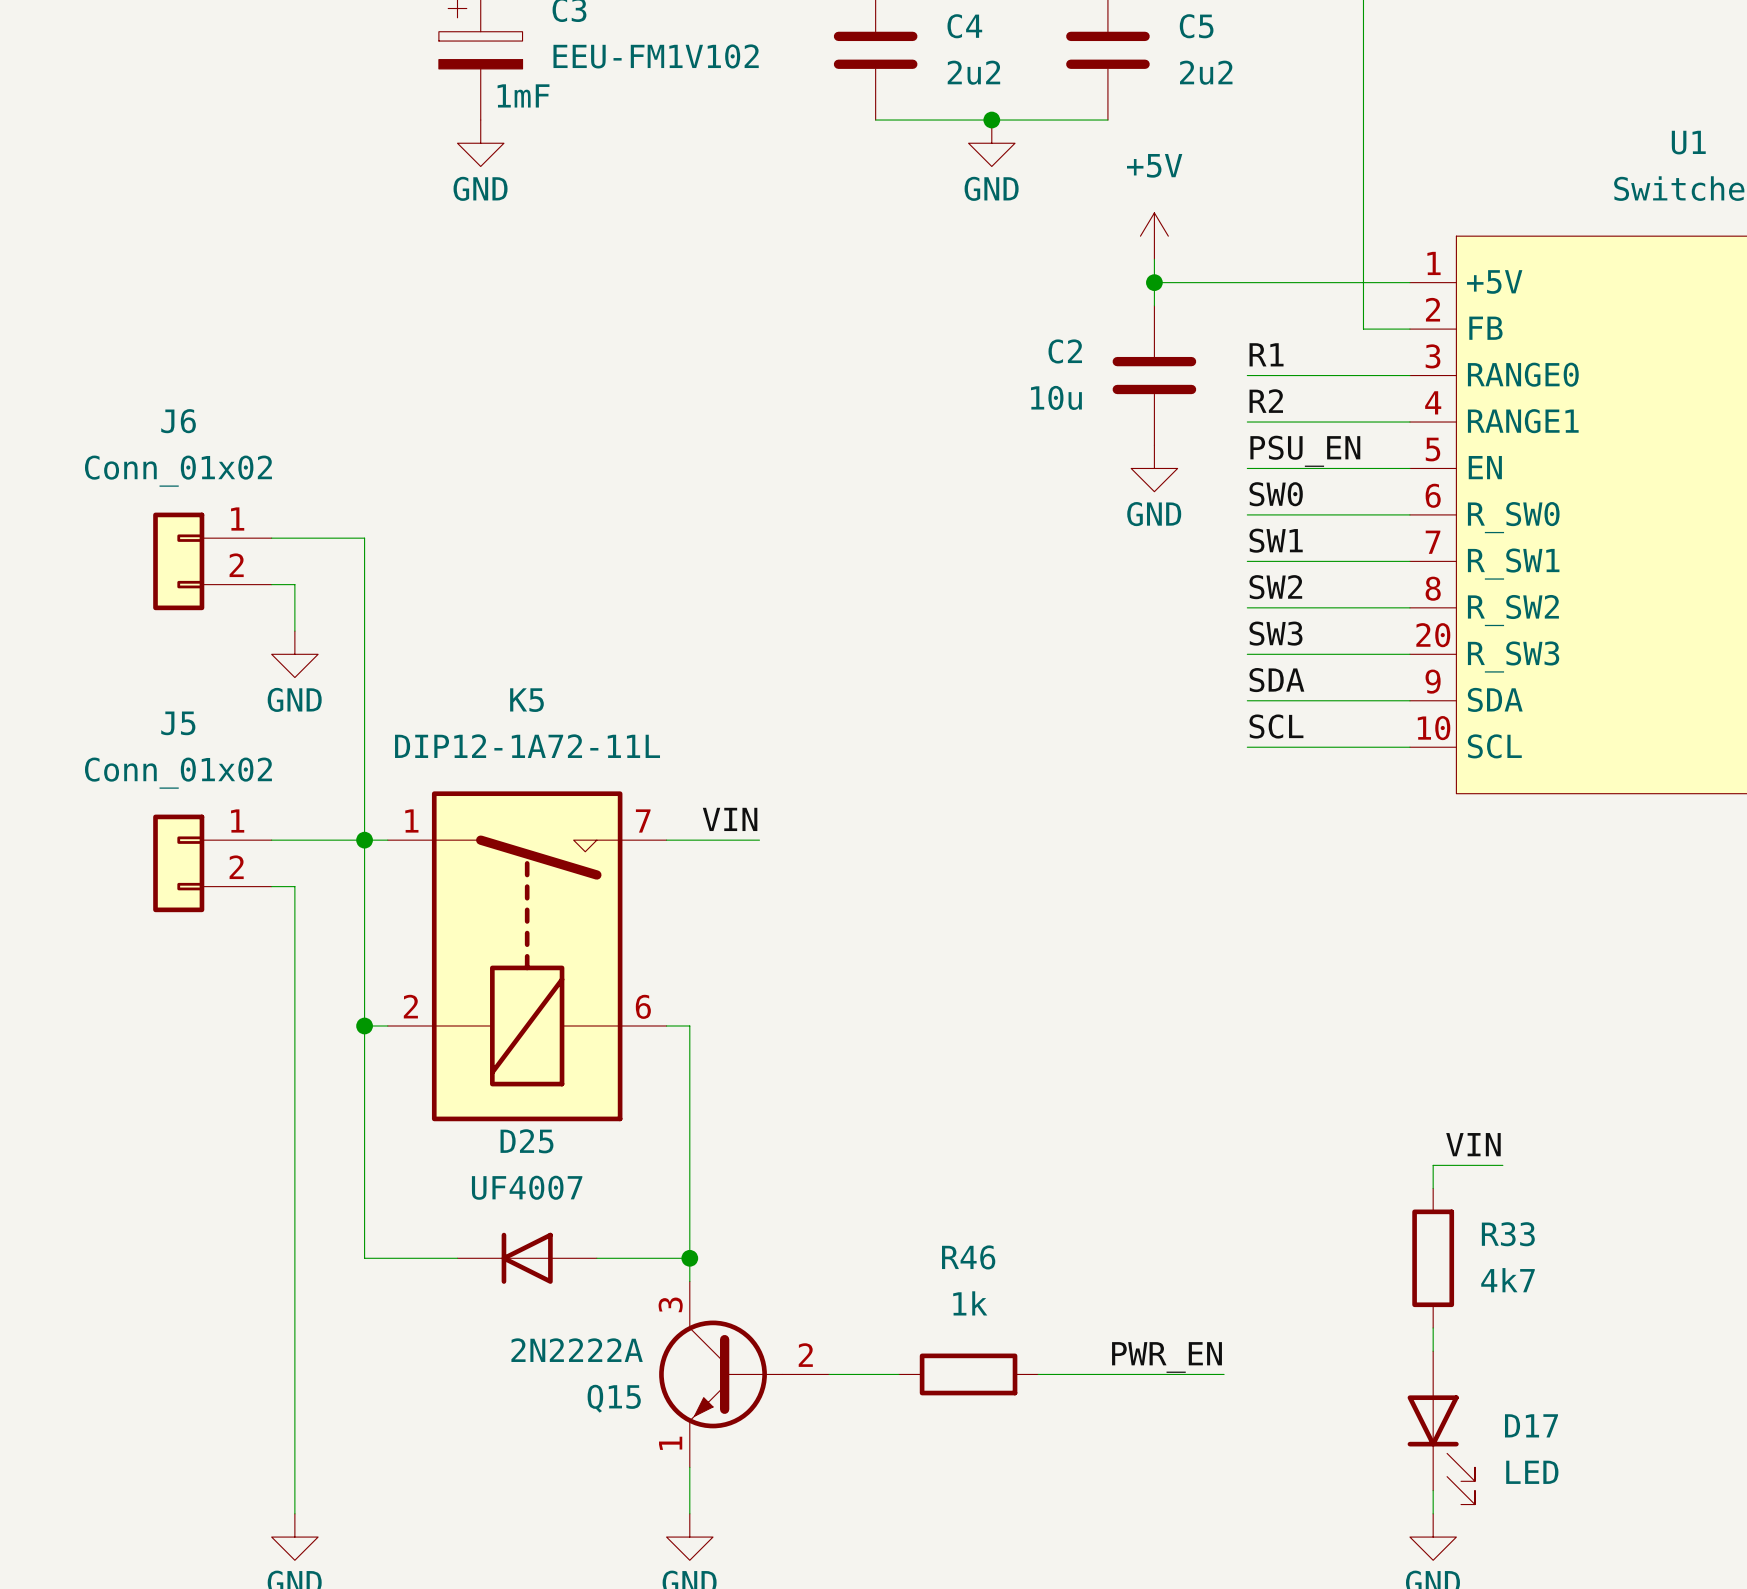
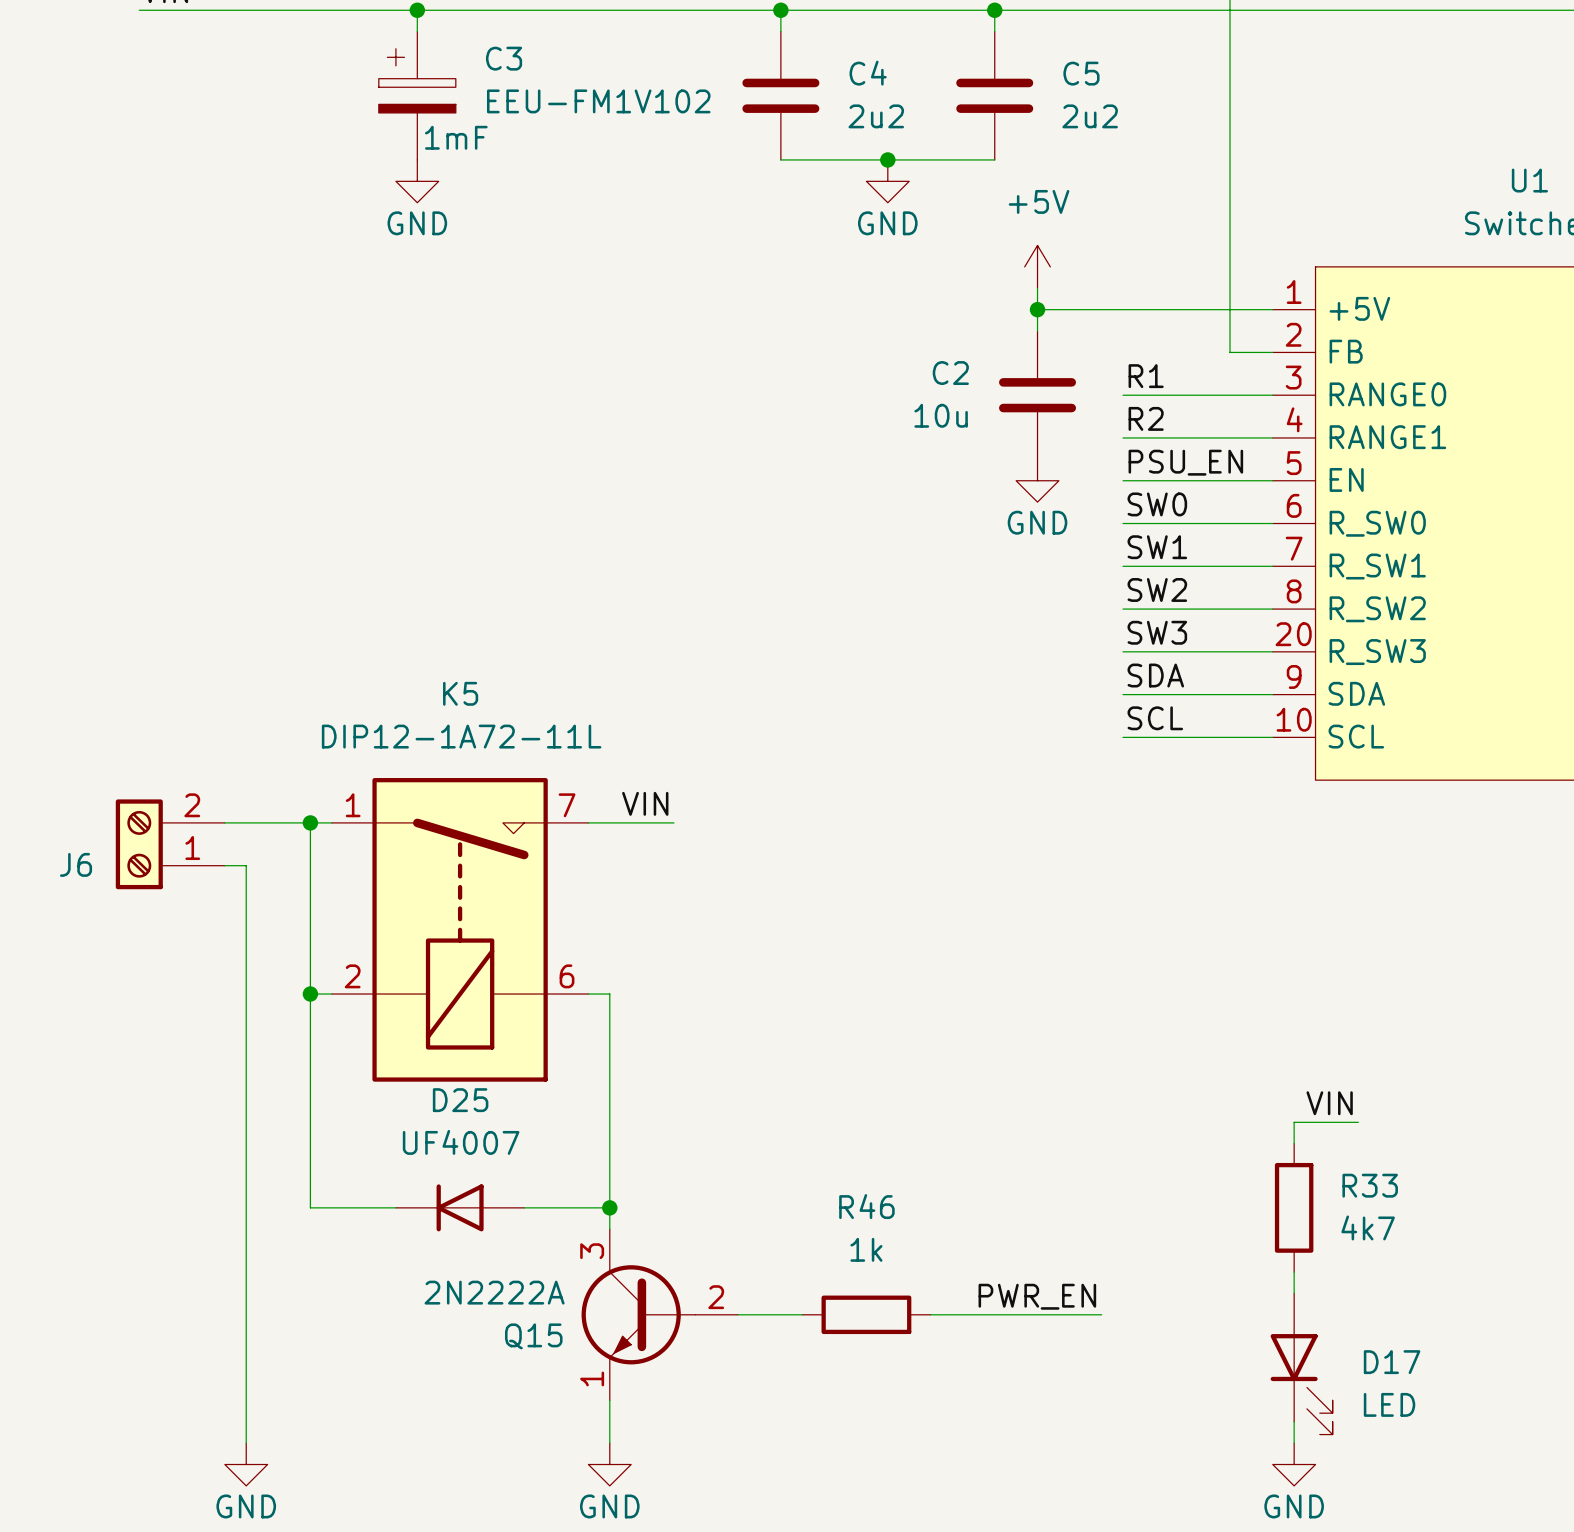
J6 name position: J6 (178, 421) -> J6 (76, 864)
J6 value: Conn_01x02 (178, 471) -> none
J6 symbol: [153, 512, 272, 611] -> [115, 799, 225, 890]
wire: (271, 538) (364, 538) (364, 840) -> none
wire: (271, 584) (294, 584) (294, 631) -> none
power symbol: GND (294, 654) -> none
J5: Conn_01x02 (212, 863) -> none

